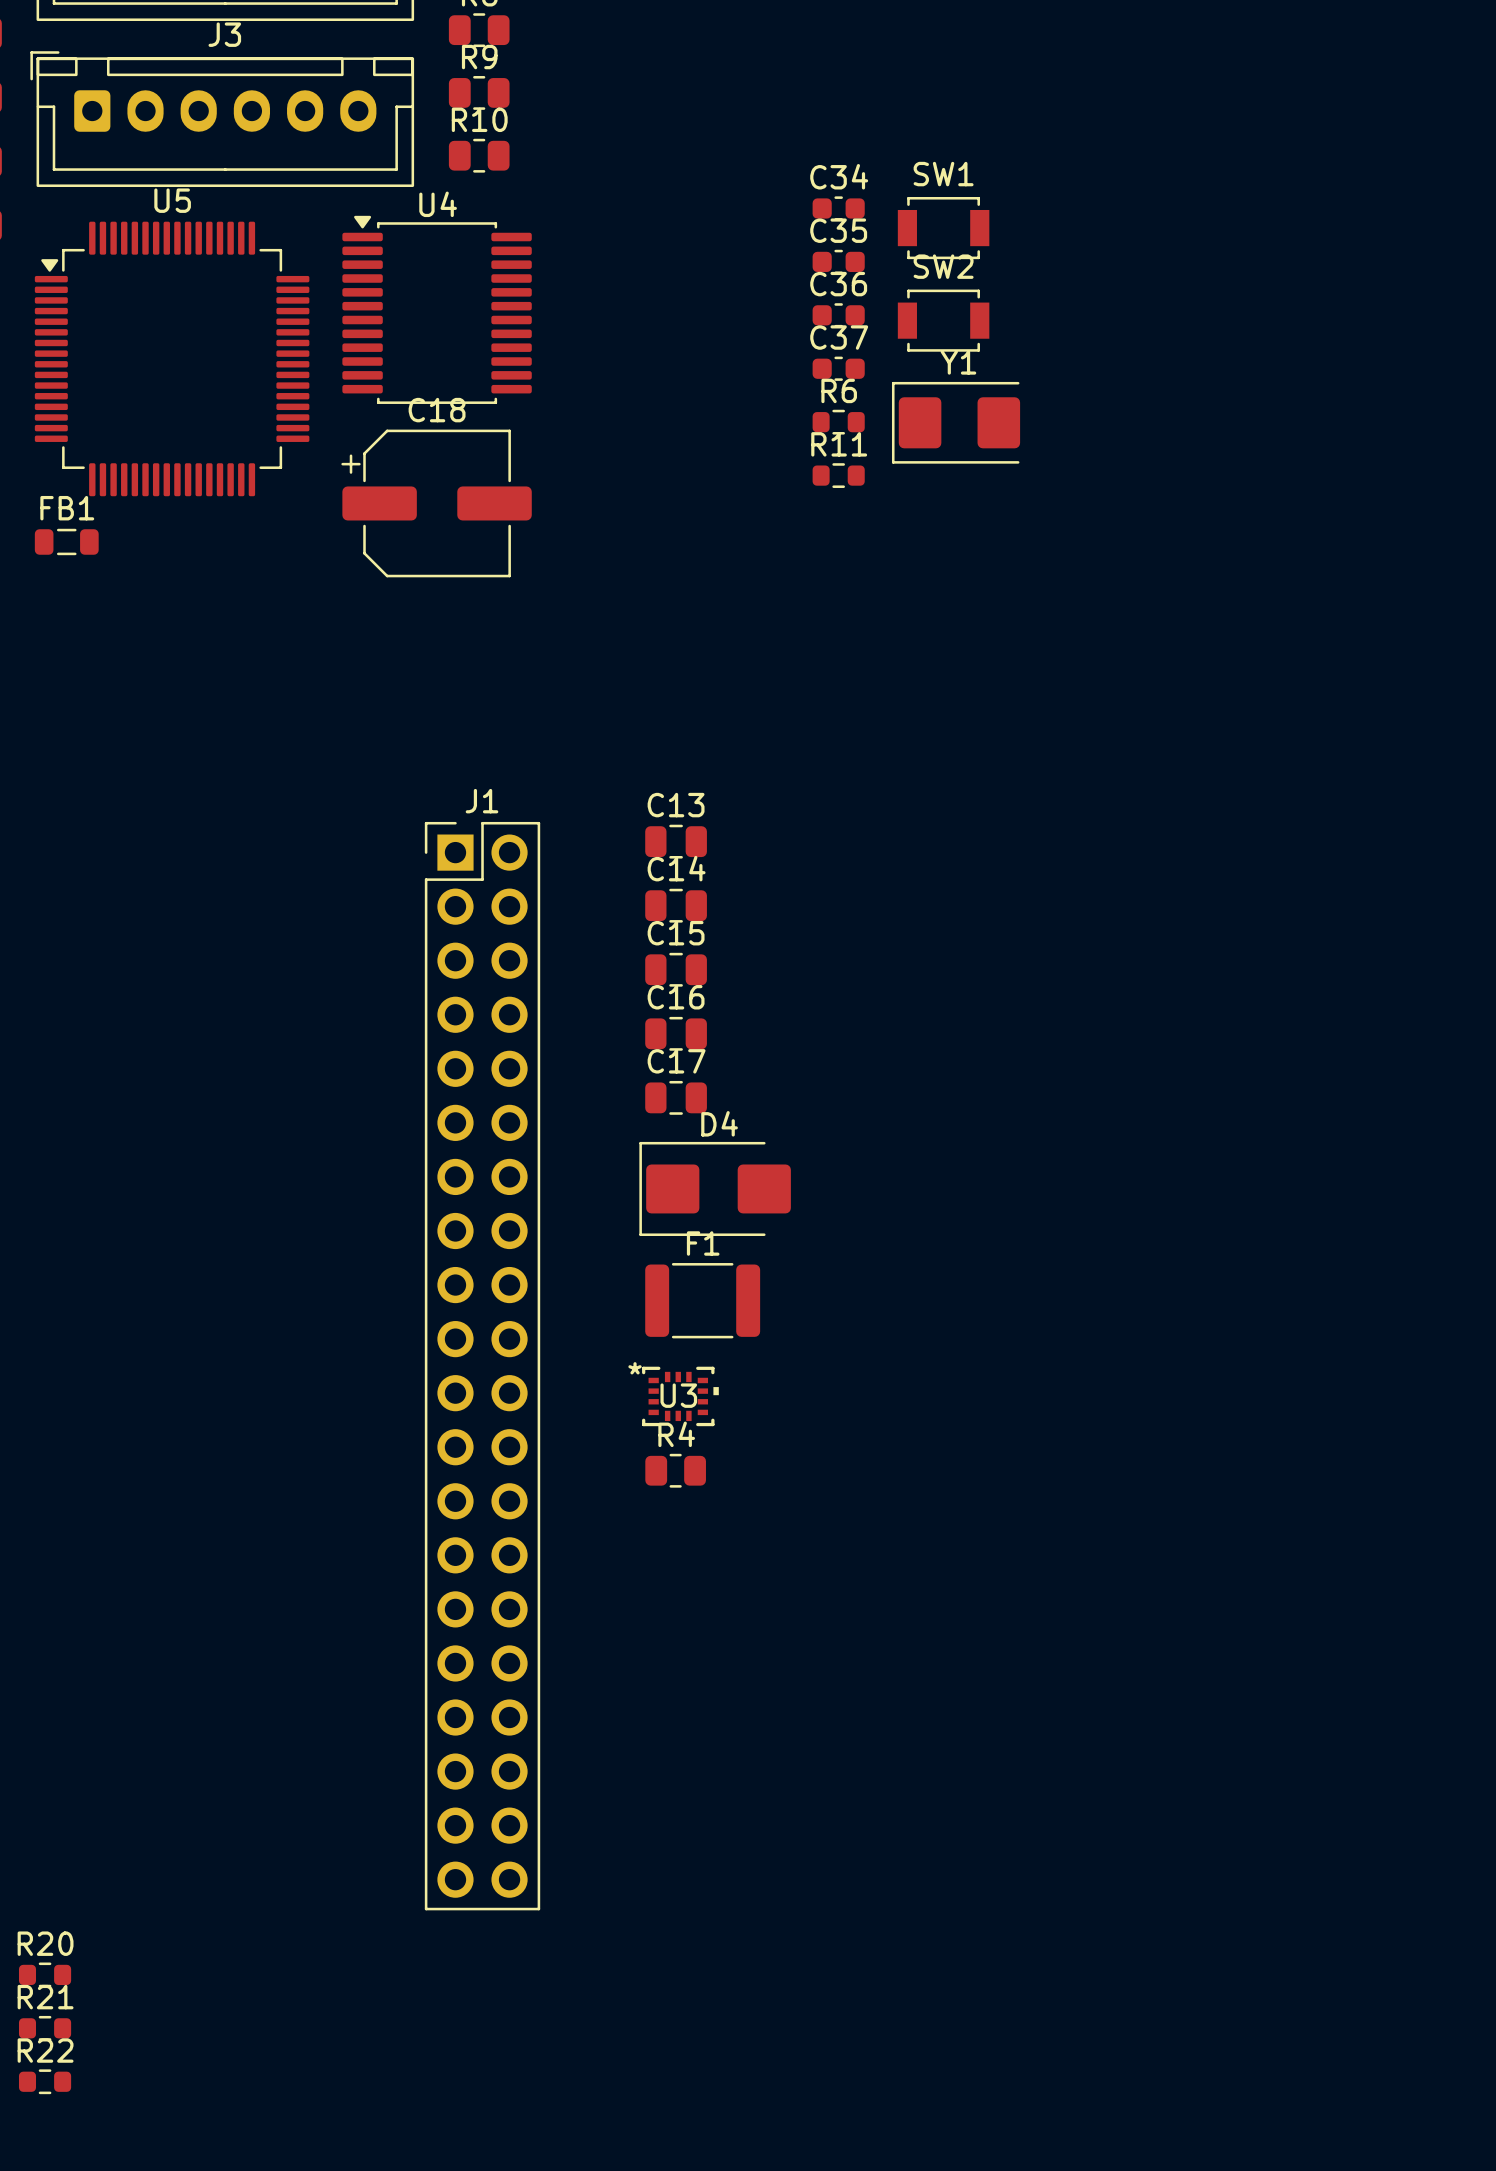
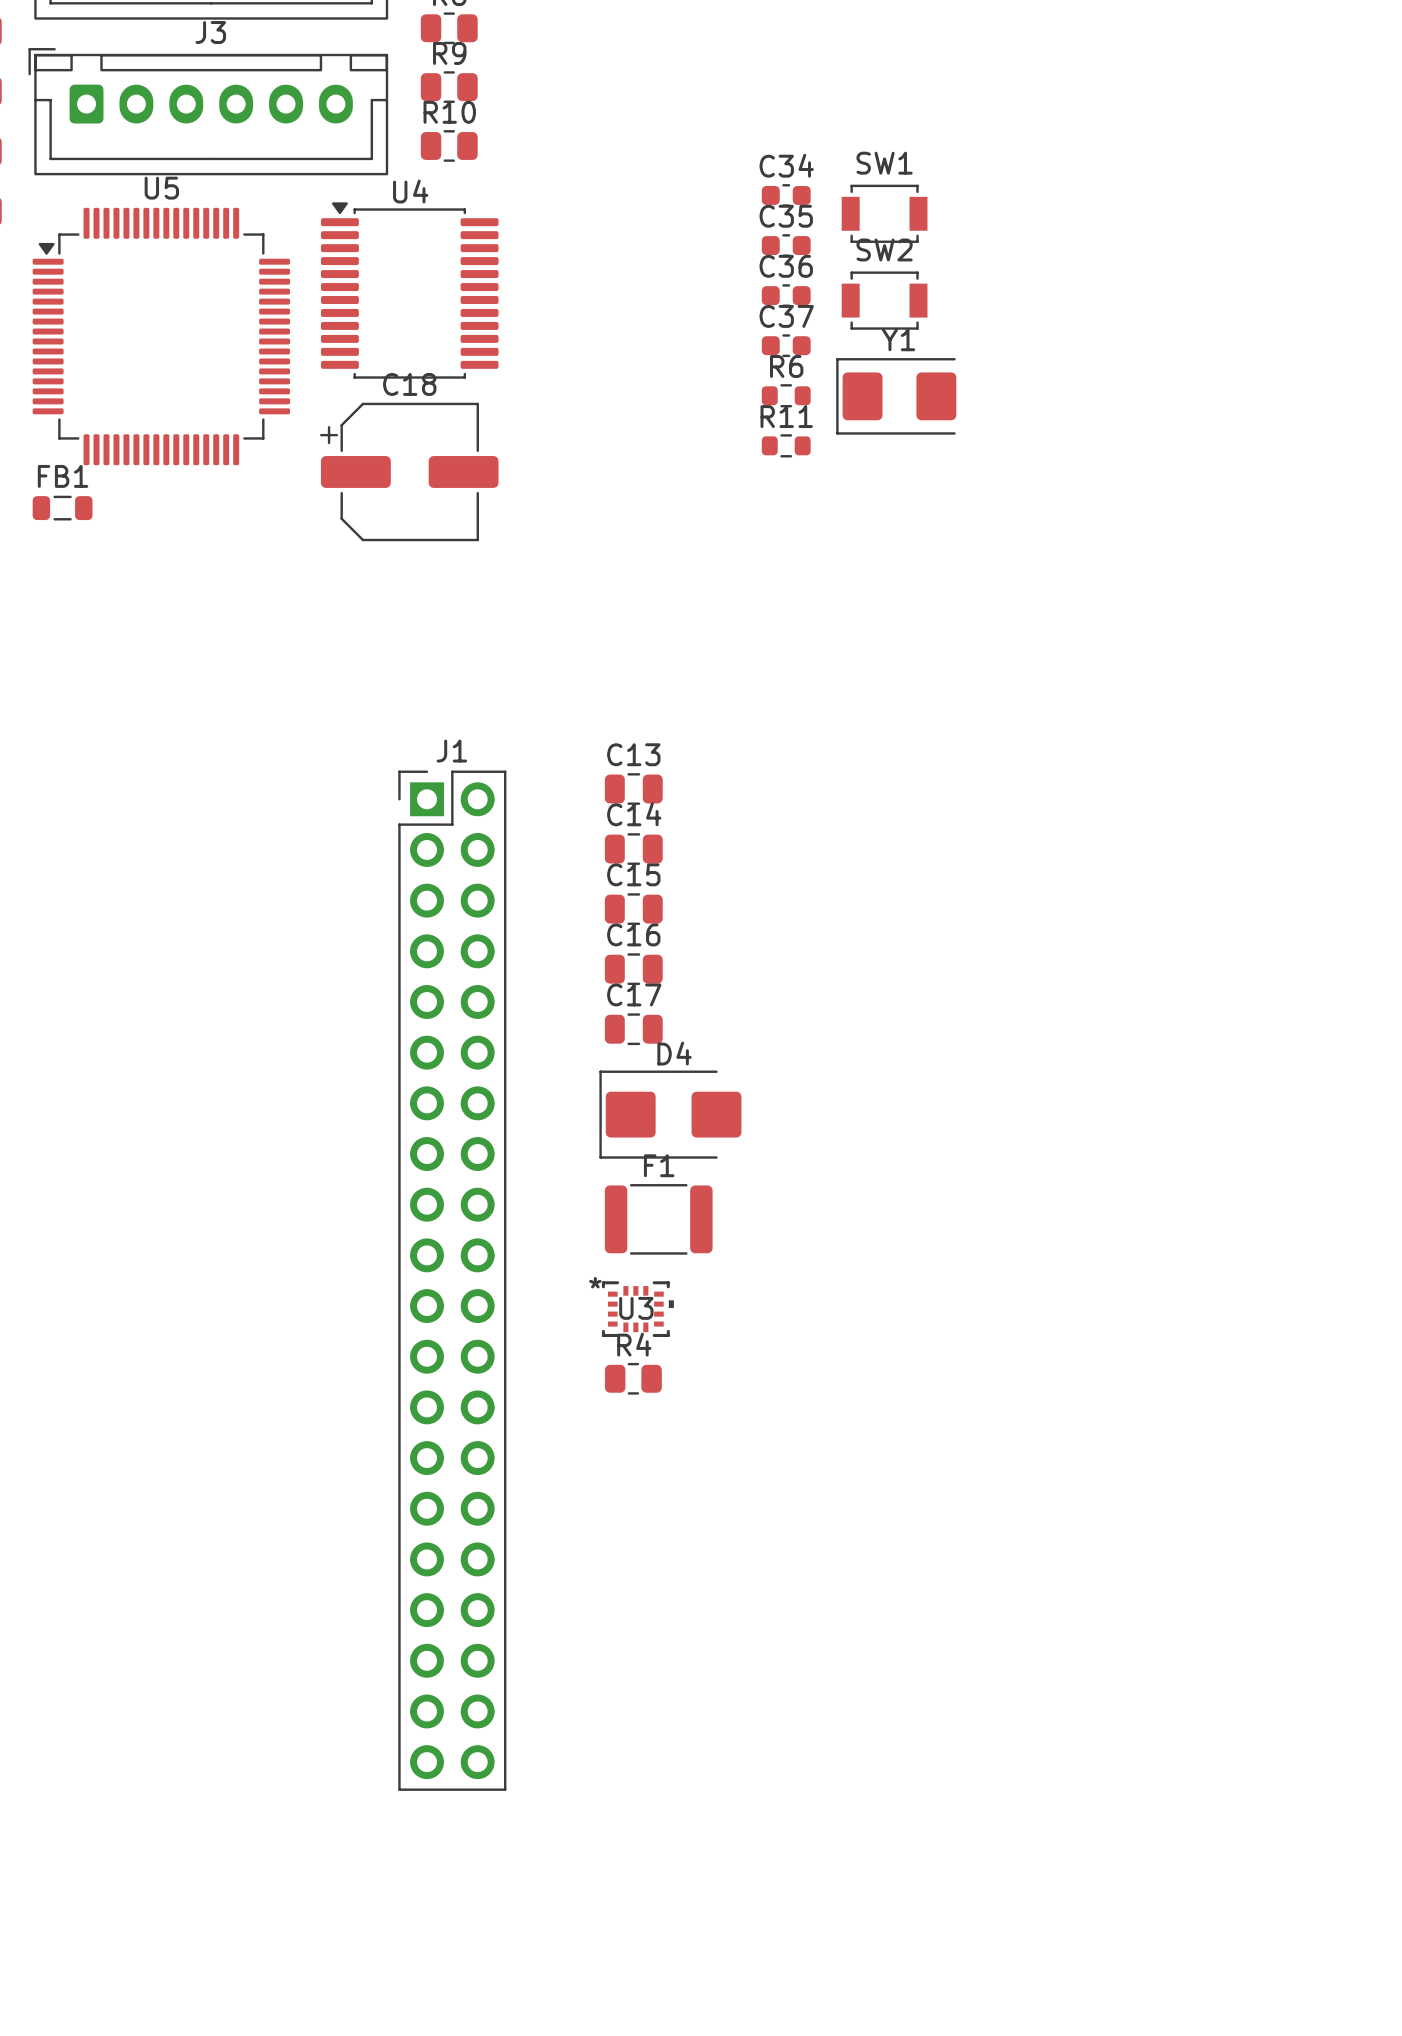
R20: (45, 1974) -> none
R21: (45, 2028) -> none
R22: (45, 2081) -> none

